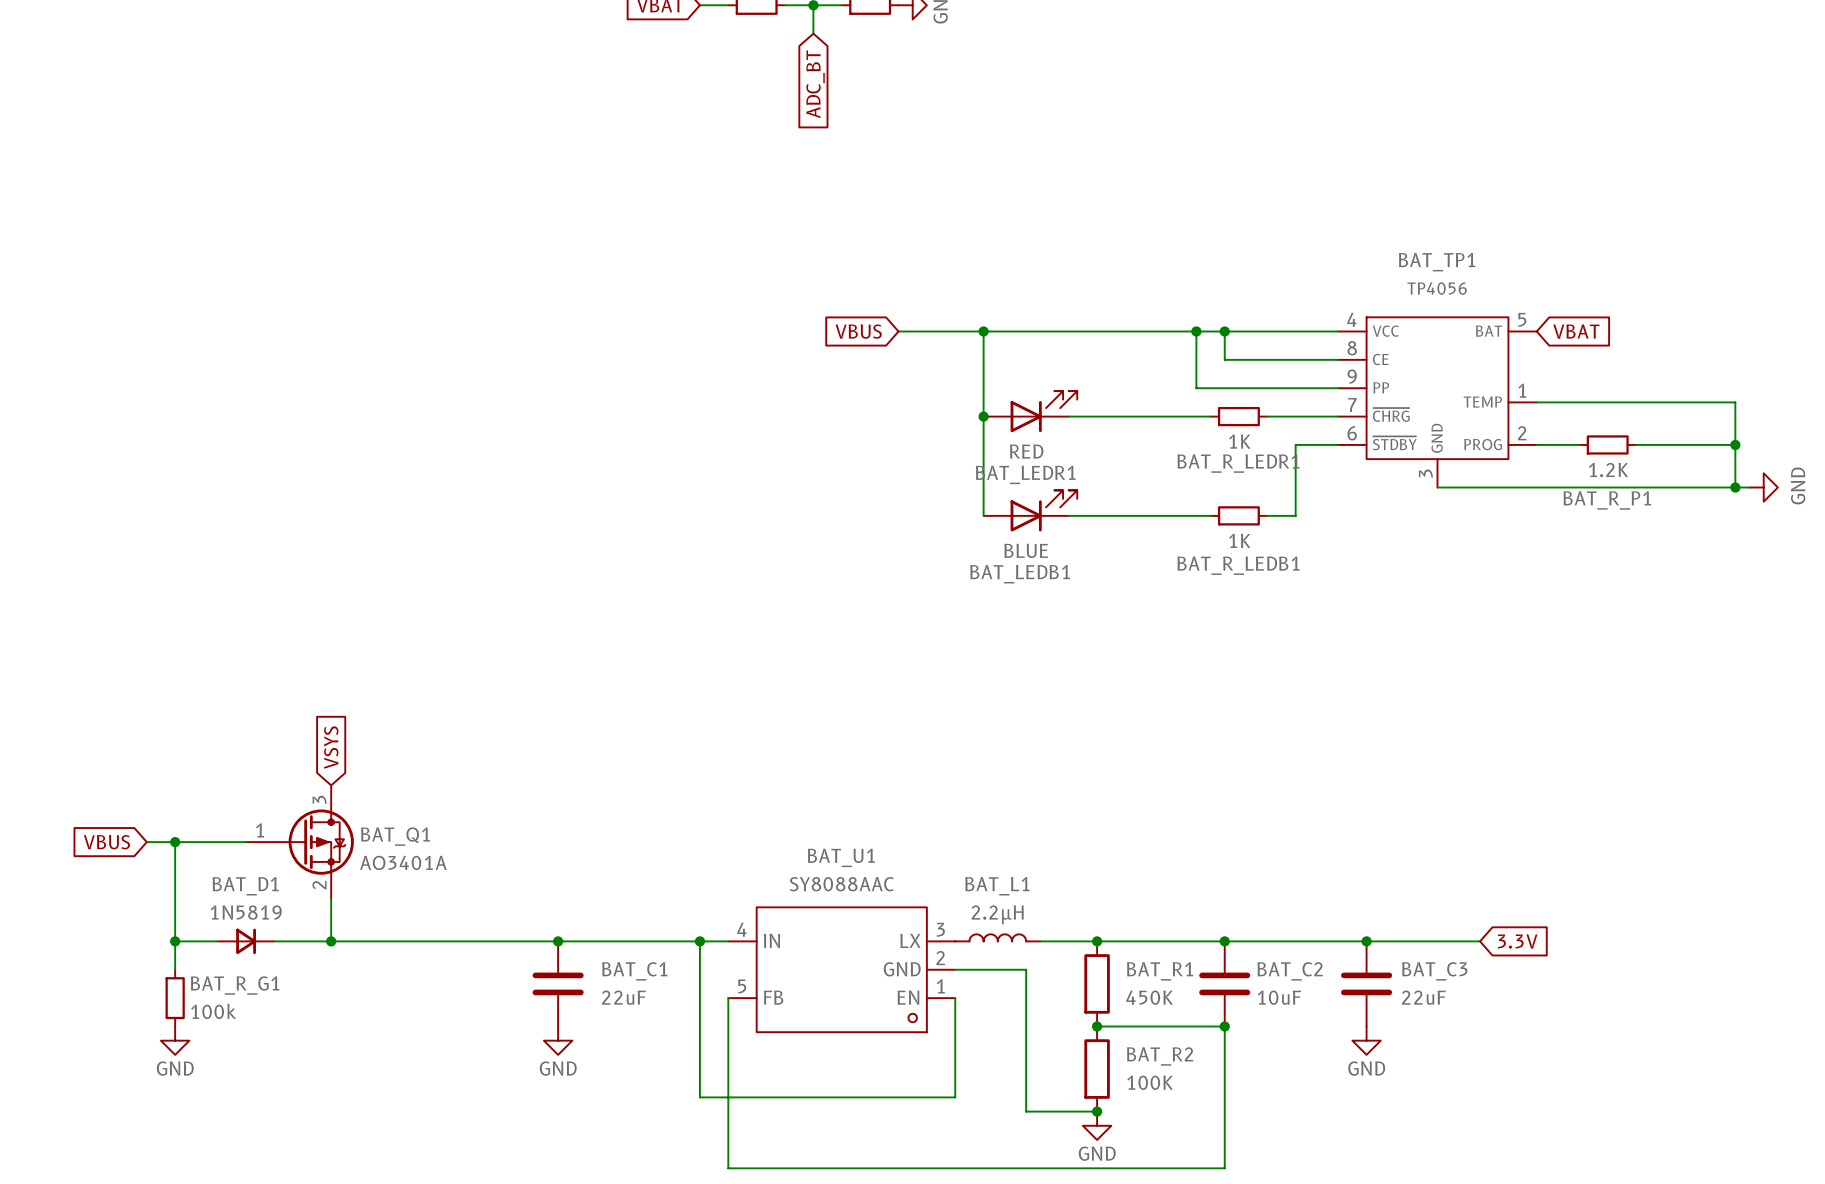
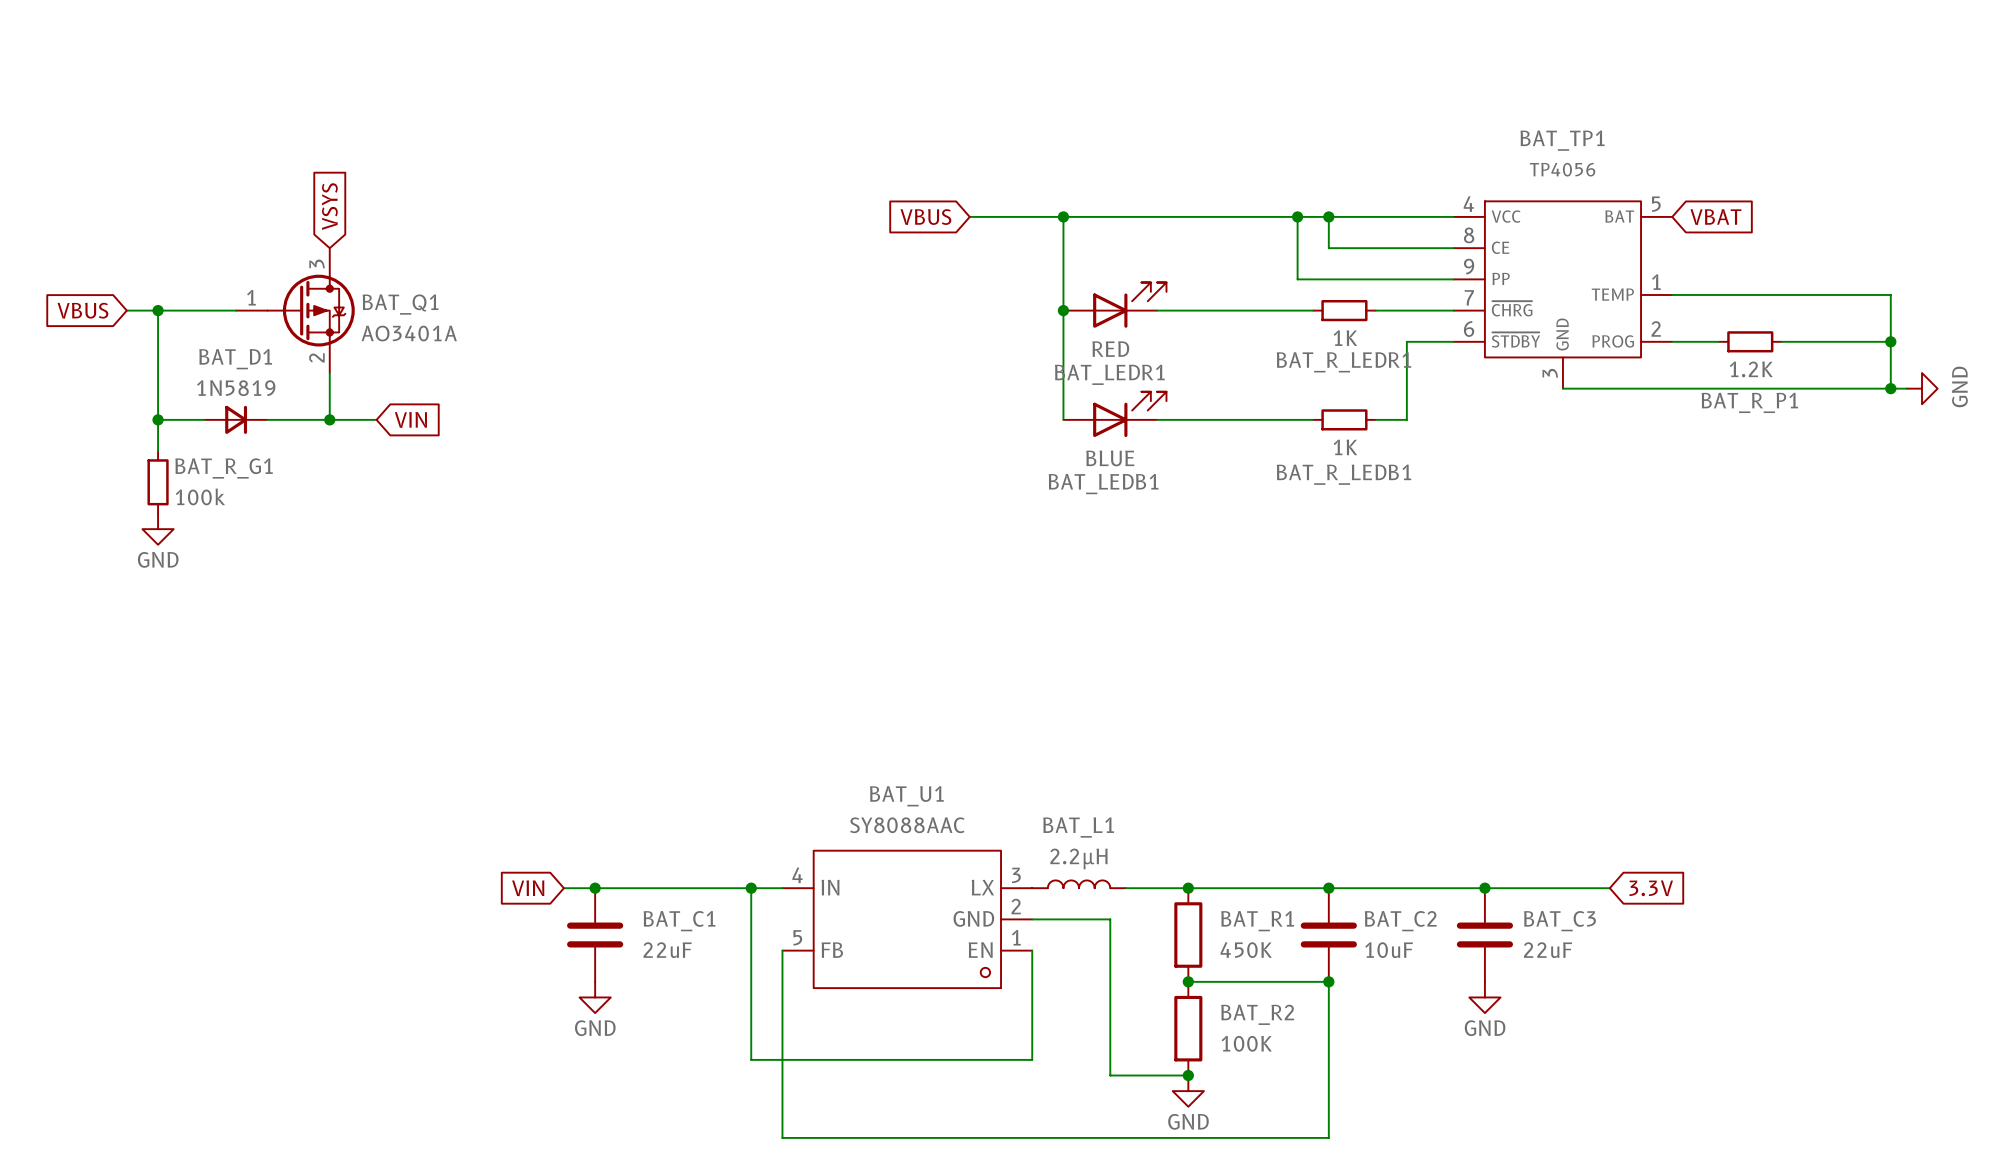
global label: none -> VSYS (329, 206)
global label: none -> VBUS (82, 310)
wire: none -> (126, 310) (236, 310)
wire: none -> (158, 310) (158, 451)
junction: none -> (158, 310)
wire: none -> (329, 373) (329, 419)
wire: none -> (158, 419) (204, 419)
junction: none -> (158, 419)
wire: none -> (267, 419) (376, 419)
junction: none -> (329, 419)
global label: none -> VIN (410, 419)
power symbol: none -> GND (158, 529)
global label: VSYS (331, 747) -> none
global label: VBUS (106, 842) -> none
wire: (146, 842) (246, 842) -> none
wire: (175, 842) (175, 969) -> none
junction: (175, 842) -> none
BAT_Q1 position: (299, 842) -> (295, 310)
wire: (331, 898) (331, 941) -> none
wire: (175, 941) (217, 941) -> none
junction: (175, 941) -> none
BAT_D1 position: (246, 941) -> (236, 419)
wire: (274, 941) (529, 941) -> none
junction: (331, 941) -> none
global label: none -> VIN (528, 888)
BAT_R_G1 position: (175, 998) -> (158, 482)
power symbol: GND (175, 1040) -> none

